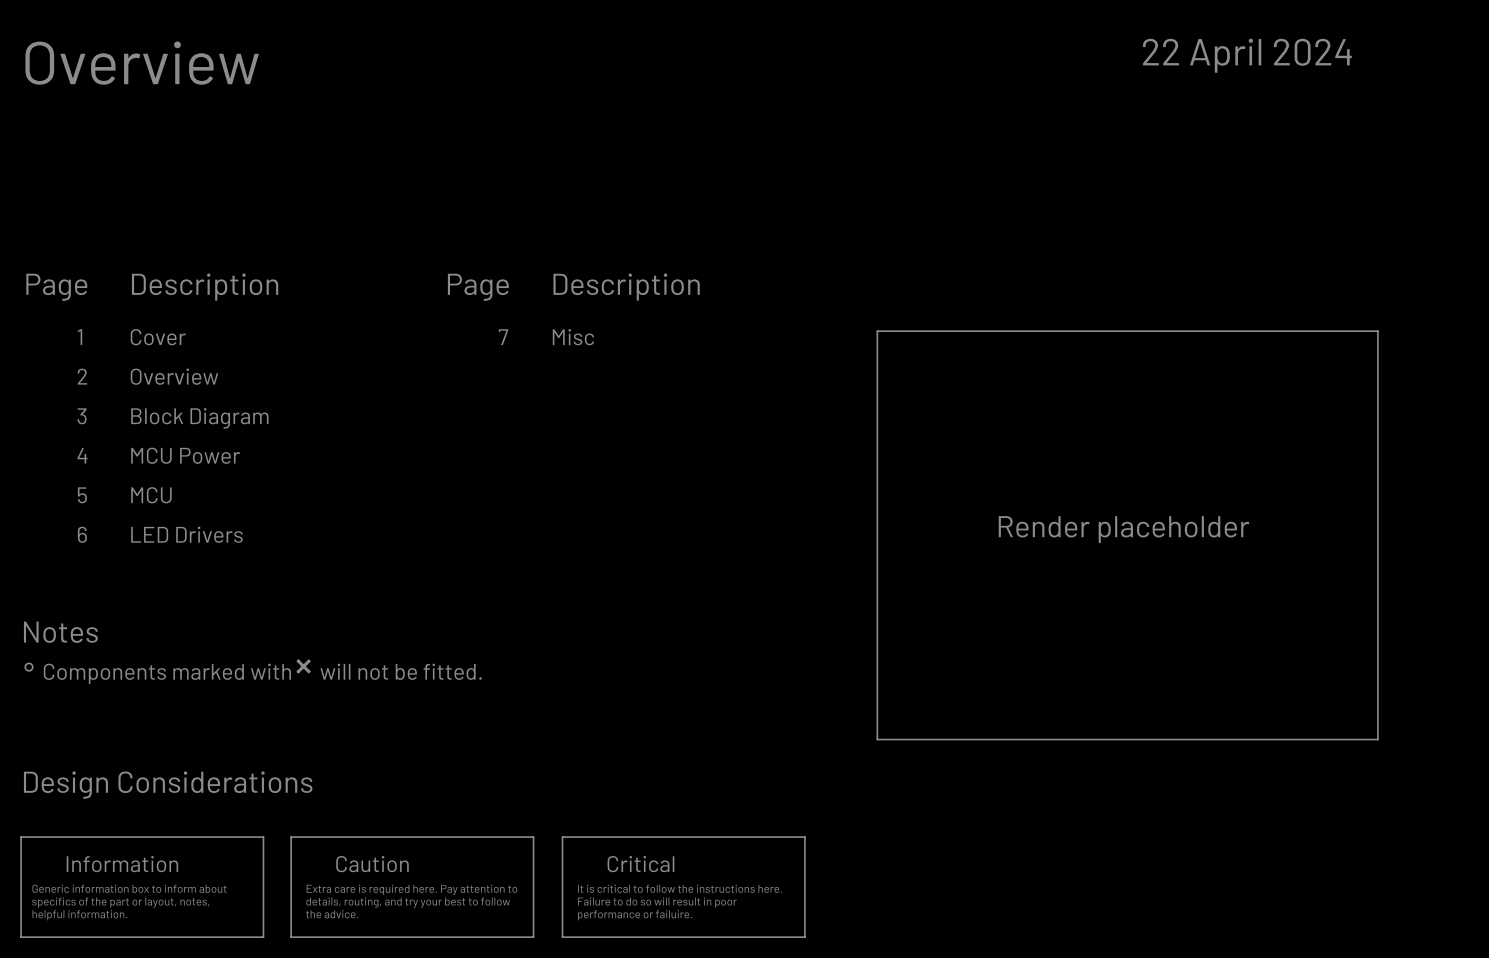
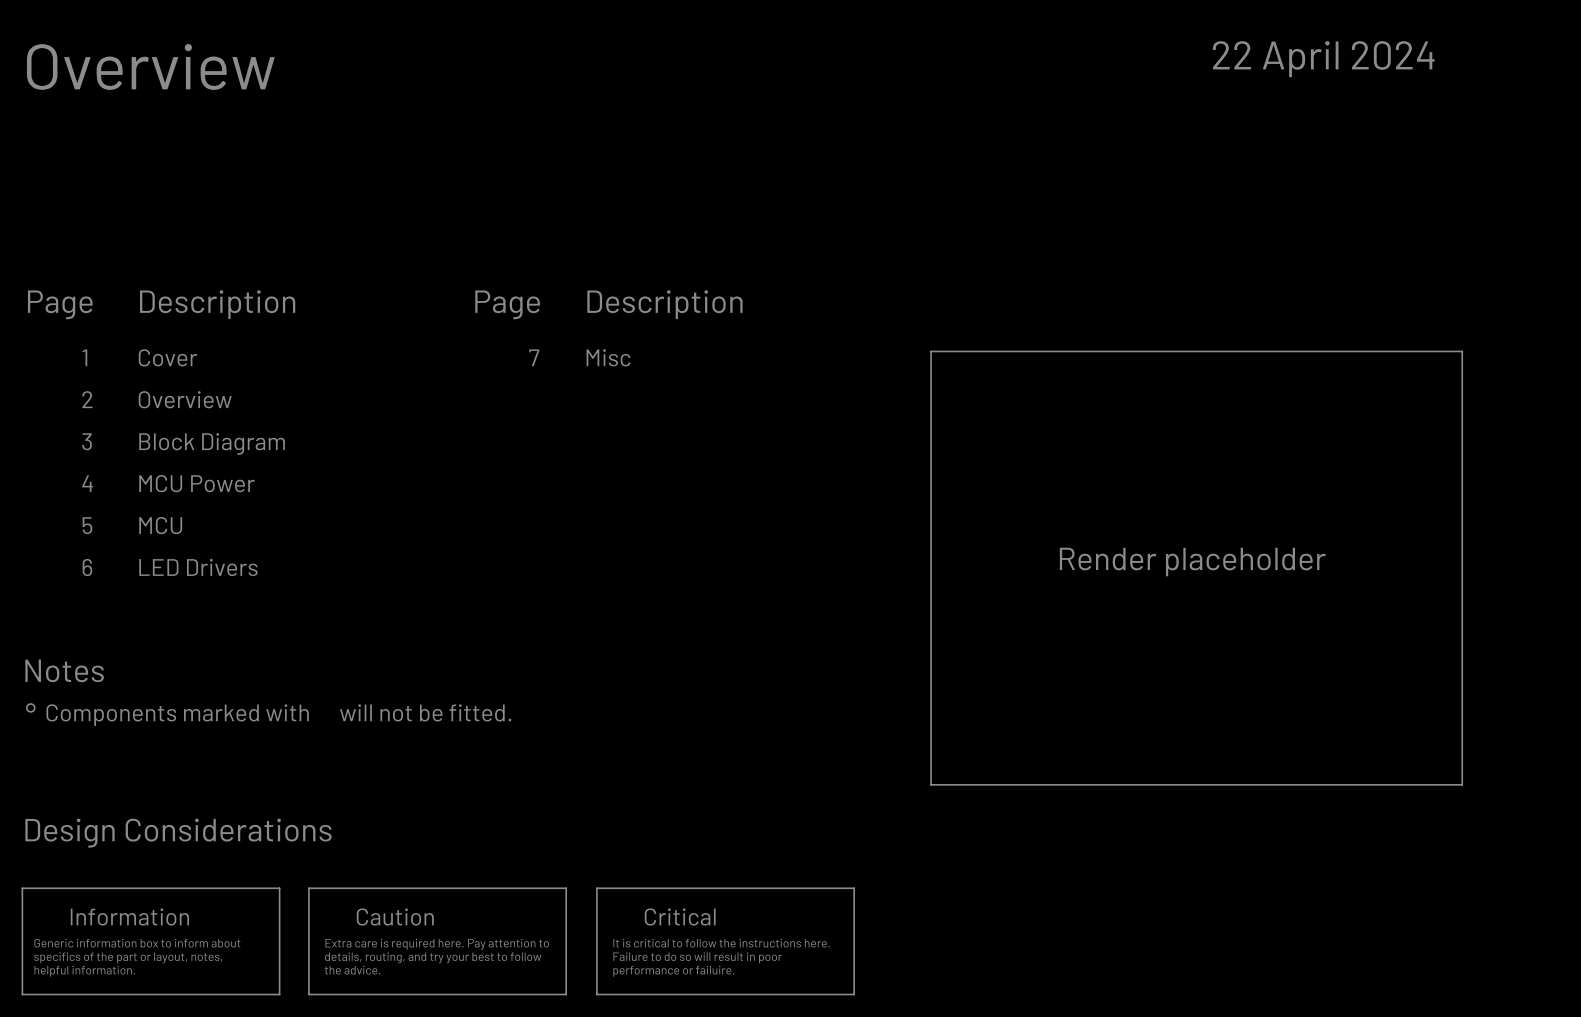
line: (298, 660) (302, 666) (297, 671) (303, 667) (308, 672) (304, 666) (309, 661) (303, 665) (298, 660) -> none

